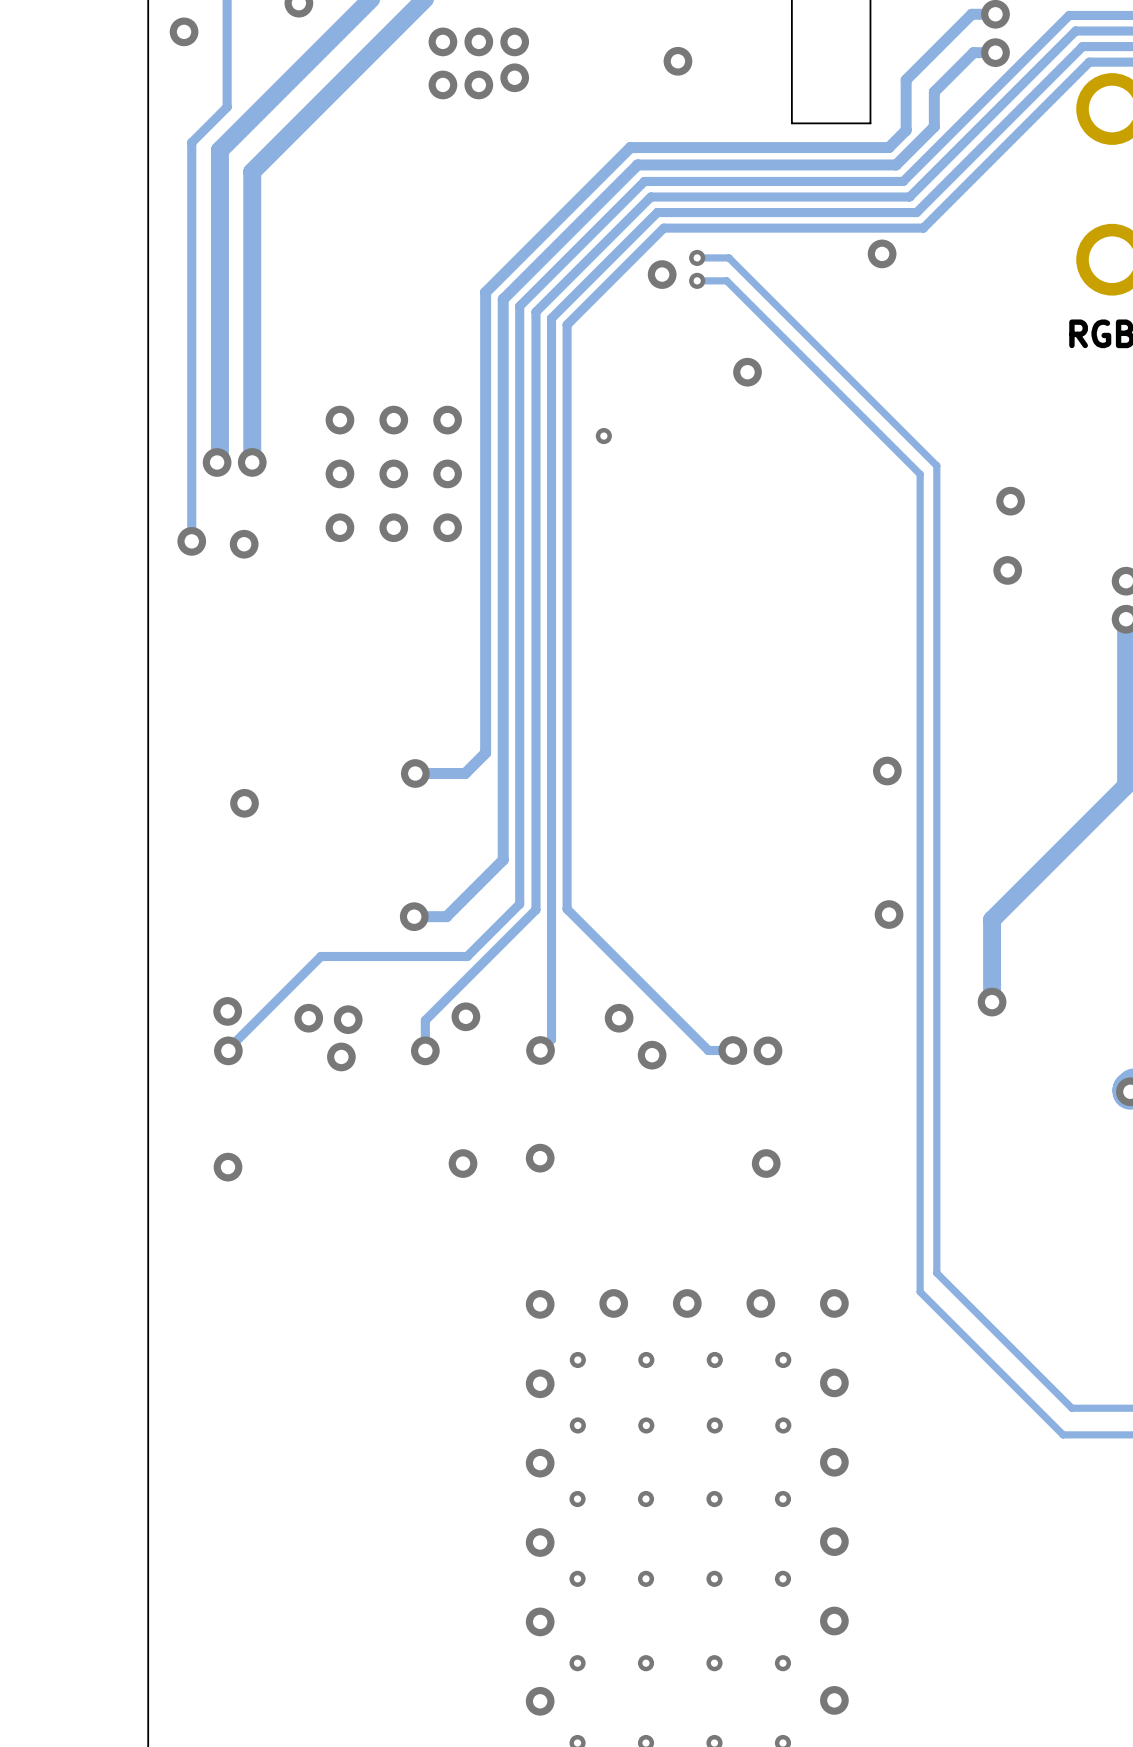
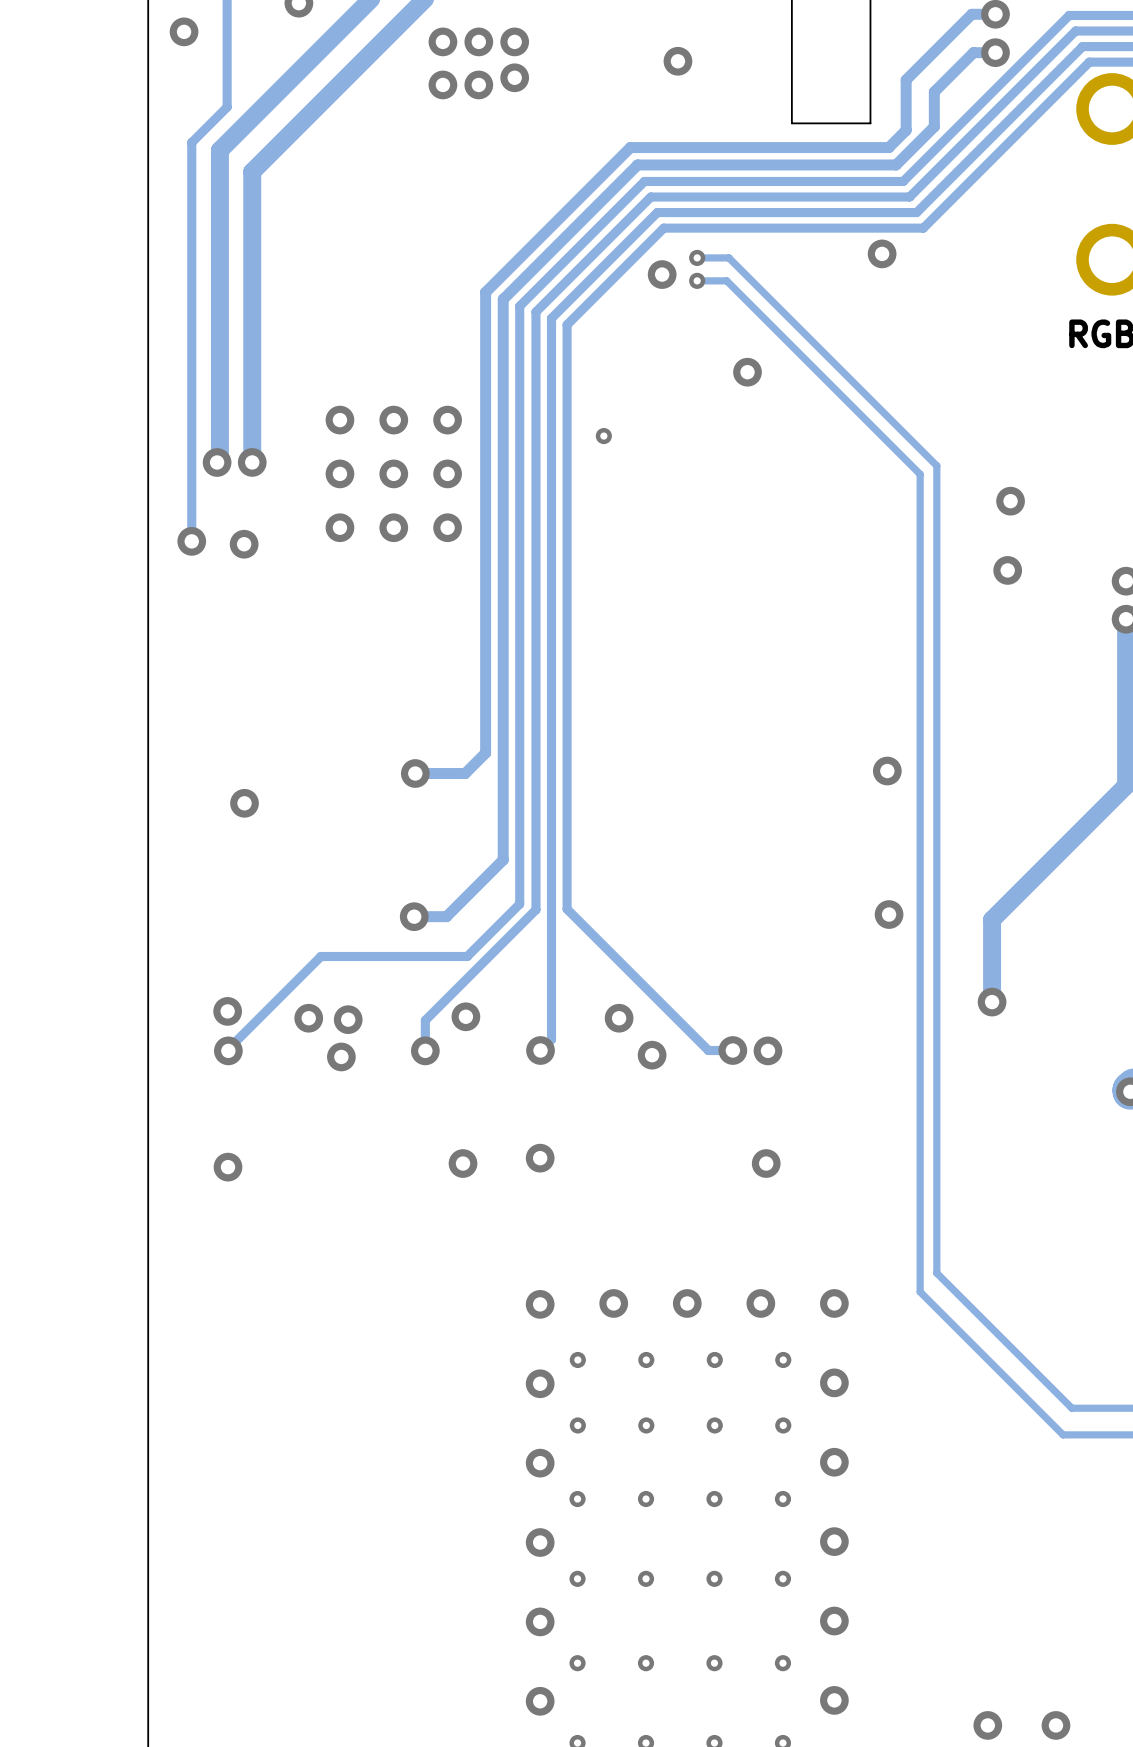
via: none -> (987, 1725)
via: none -> (1055, 1725)

